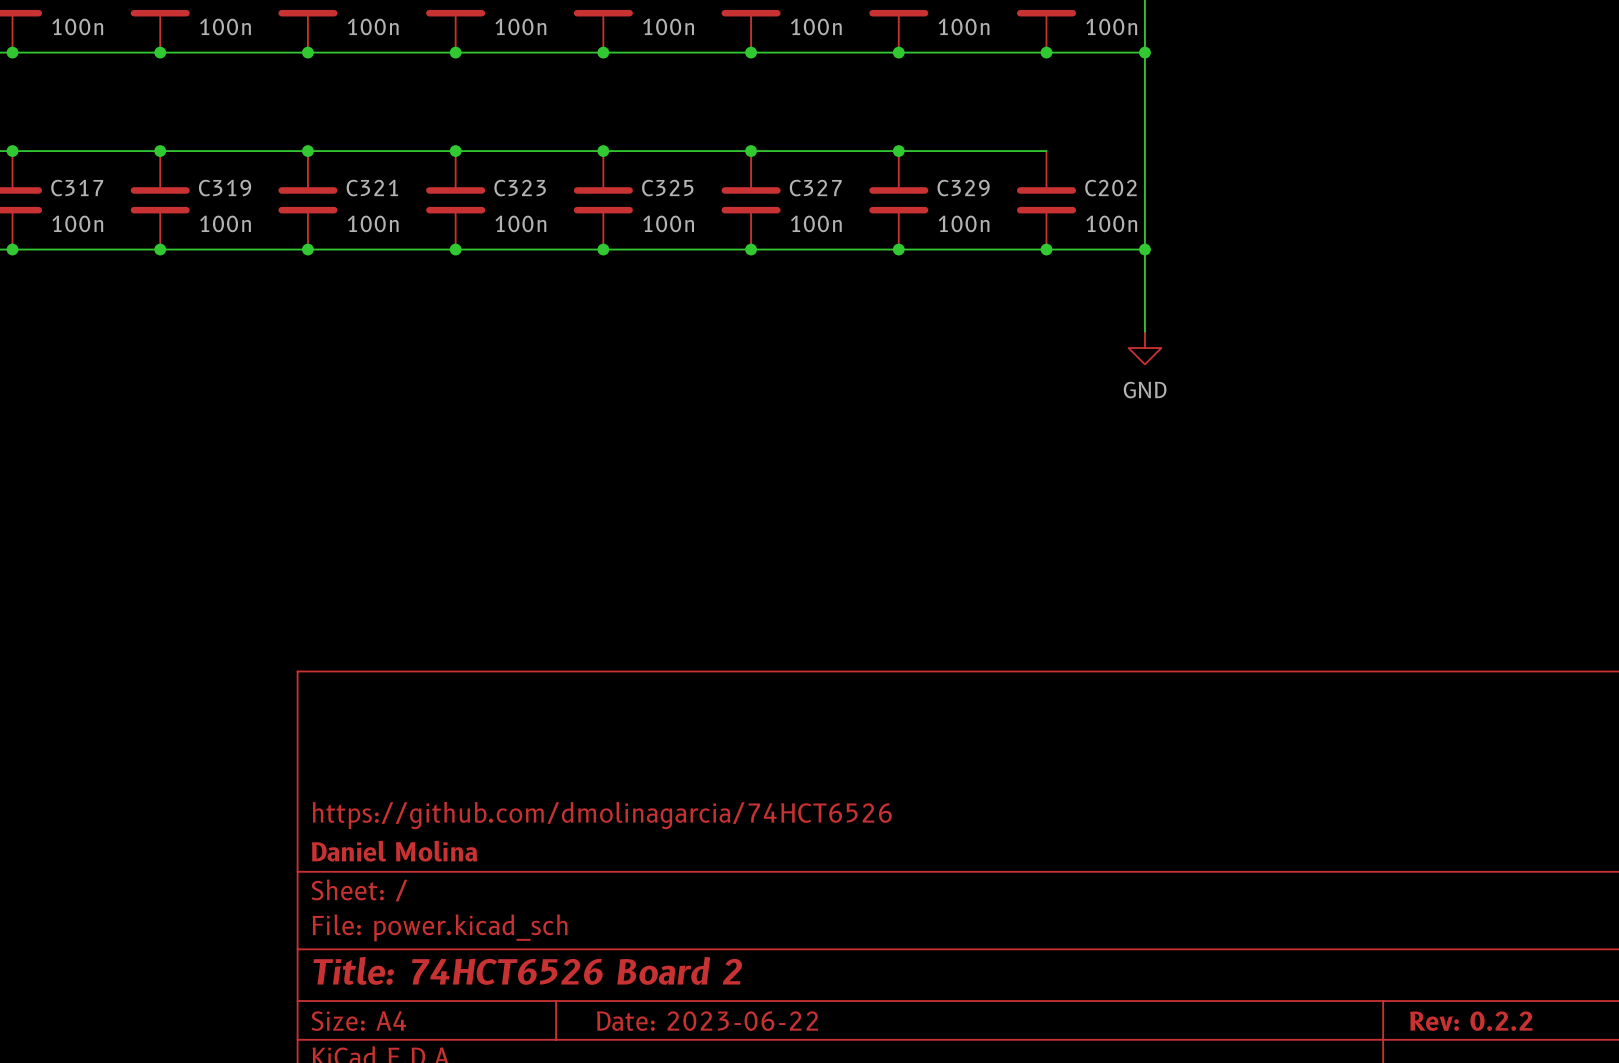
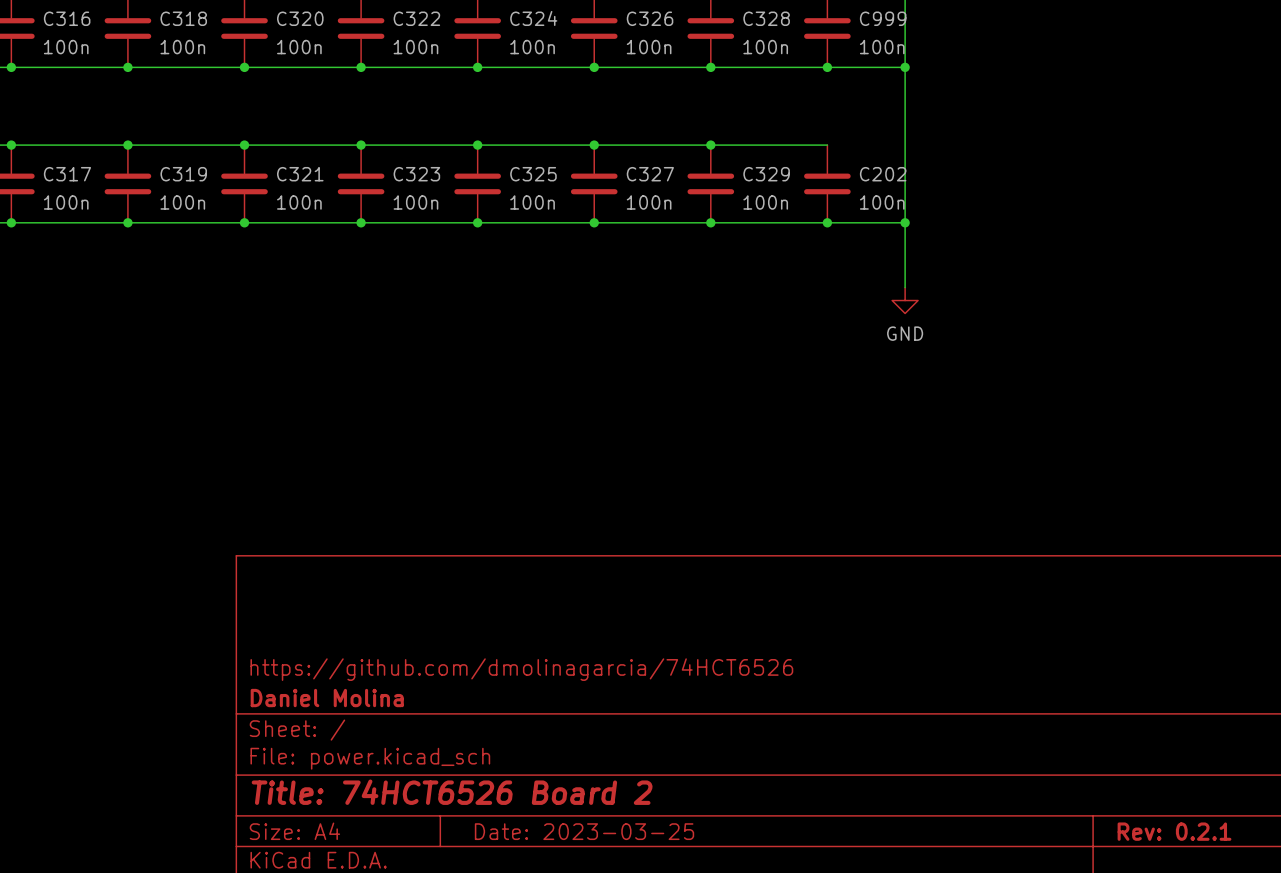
title block: Date: 2023-06-22 (707, 1021) -> Date: 2023-03-25 (584, 831)
title block: Rev: 0.2.2 (1471, 1021) -> Rev: 0.2.1 (1174, 831)

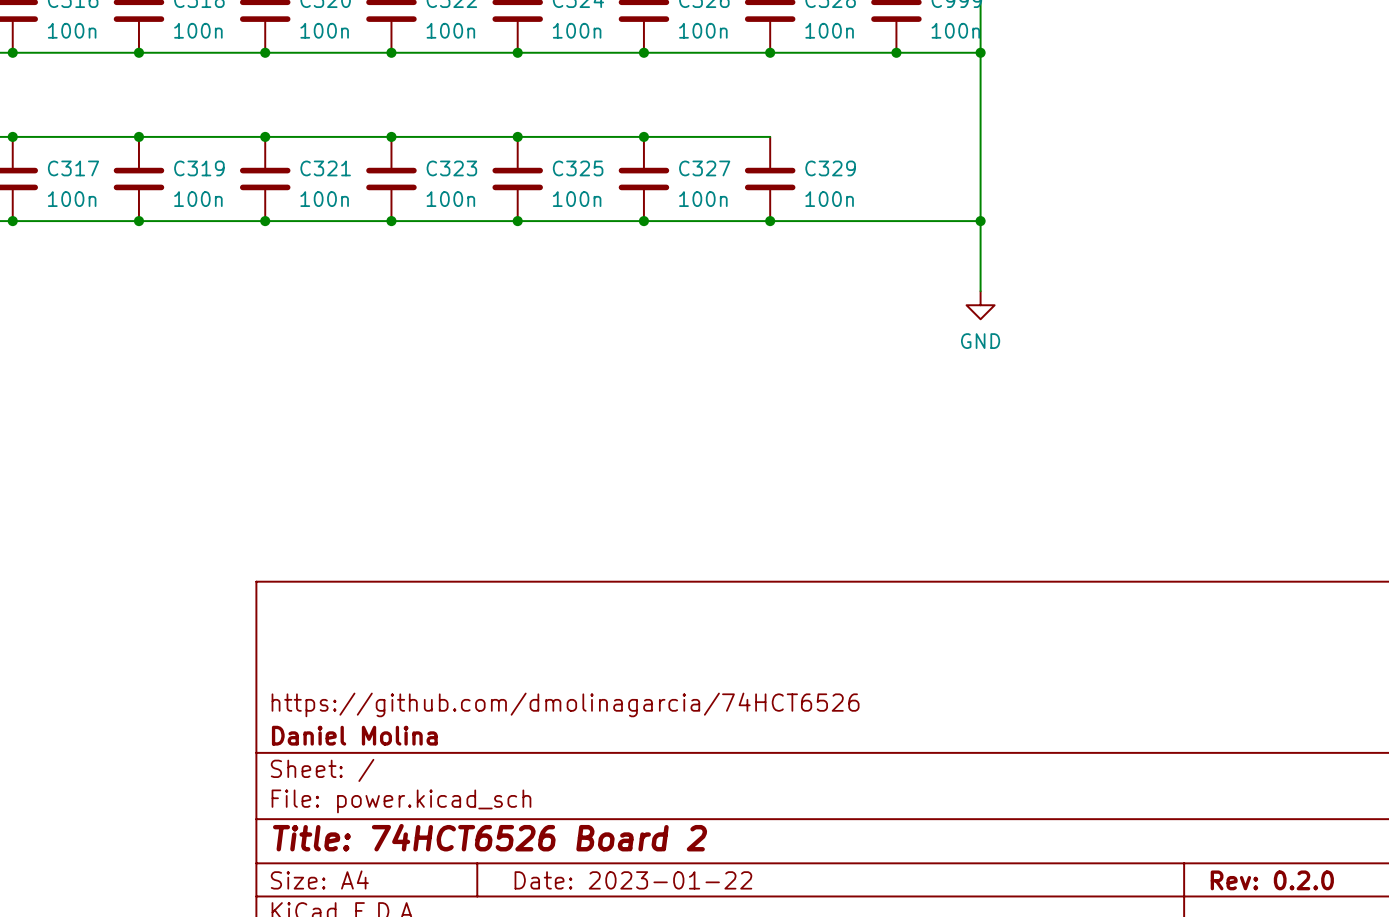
wire: (710, 145) (827, 145) -> none
junction: (710, 145) -> none
C202: 100n (827, 183) -> none
junction: (827, 222) -> none
title block: Date: 2023-03-25 (584, 831) -> Date: 2023-01-22 (633, 880)
title block: Rev: 0.2.1 (1174, 831) -> Rev: 0.2.0 (1272, 880)

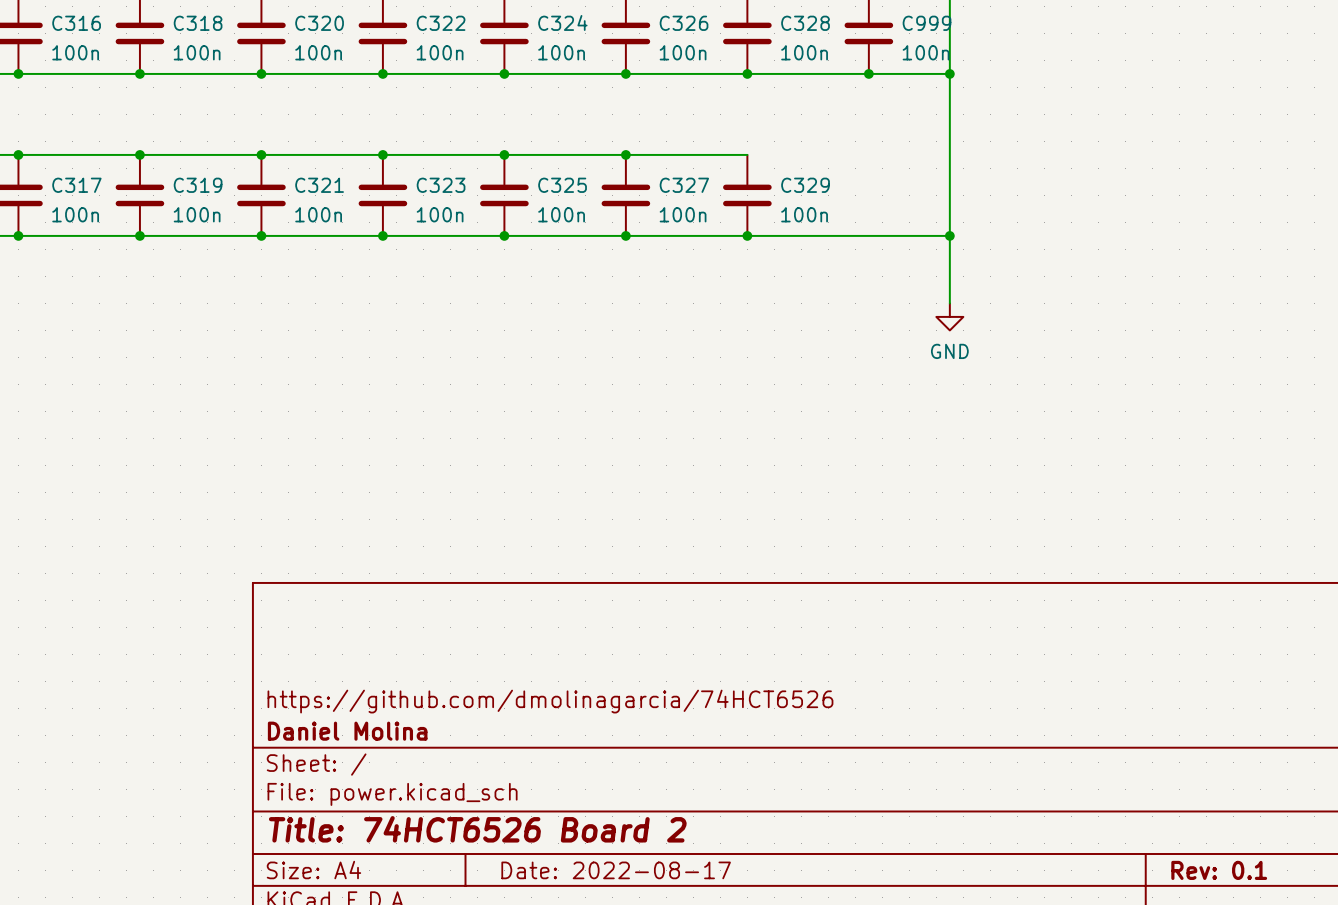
title block: Date: 2023-01-22 (633, 880) -> Date: 2022-08-17 (616, 870)
title block: Rev: 0.2.0 (1272, 880) -> Rev: 0.1 (1219, 870)

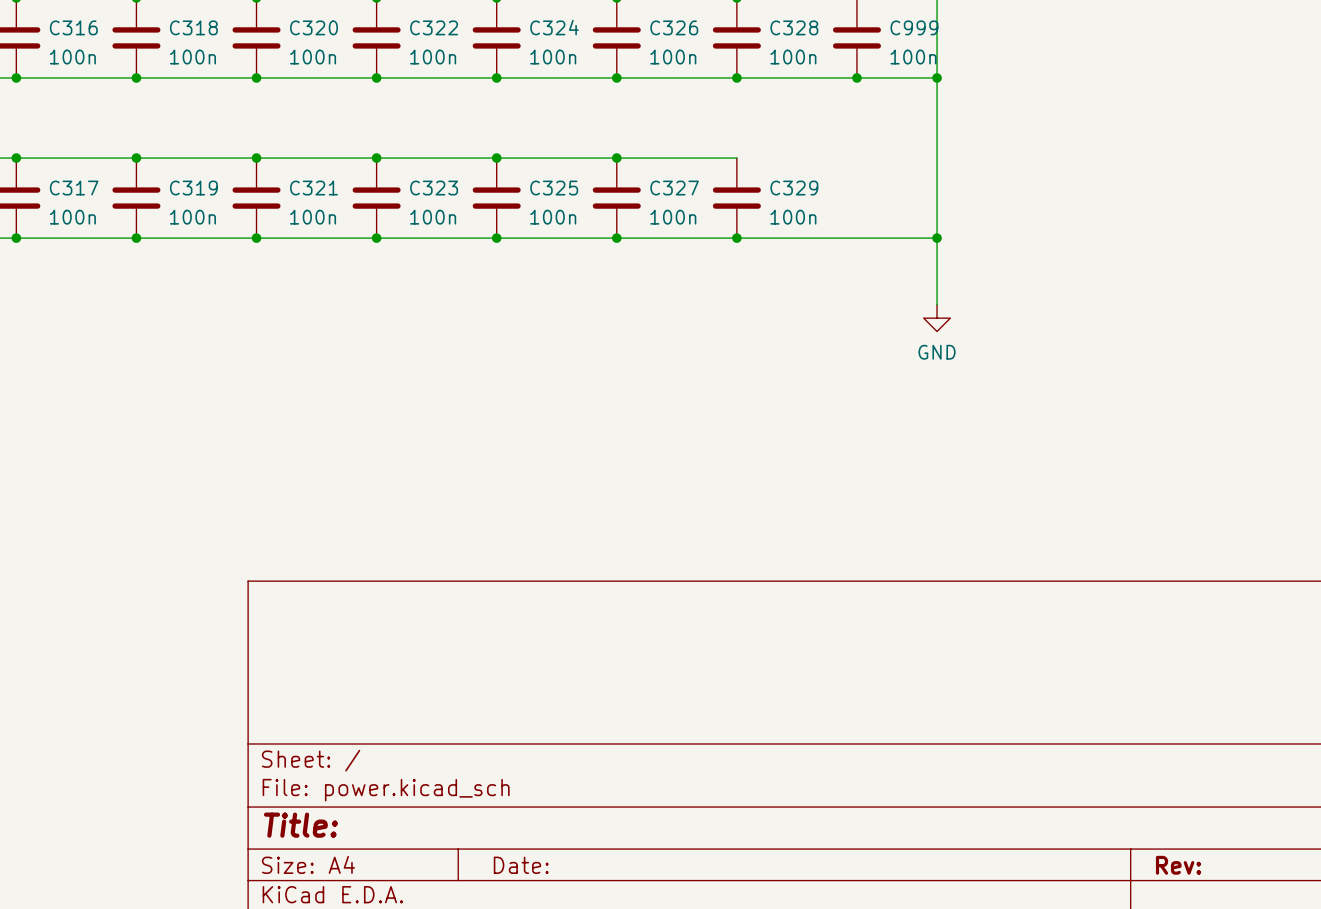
title block: https://github.com/dmolinagarcia/74HCT6526 (550, 701) -> none
title block: Daniel Molina (347, 731) -> none
title block: Title: 74HCT6526 Board 2 (477, 829) -> Title: (300, 825)
title block: Date: 2022-08-17 (616, 870) -> Date: (521, 865)
title block: Rev: 0.1 (1219, 870) -> Rev: (1178, 865)

